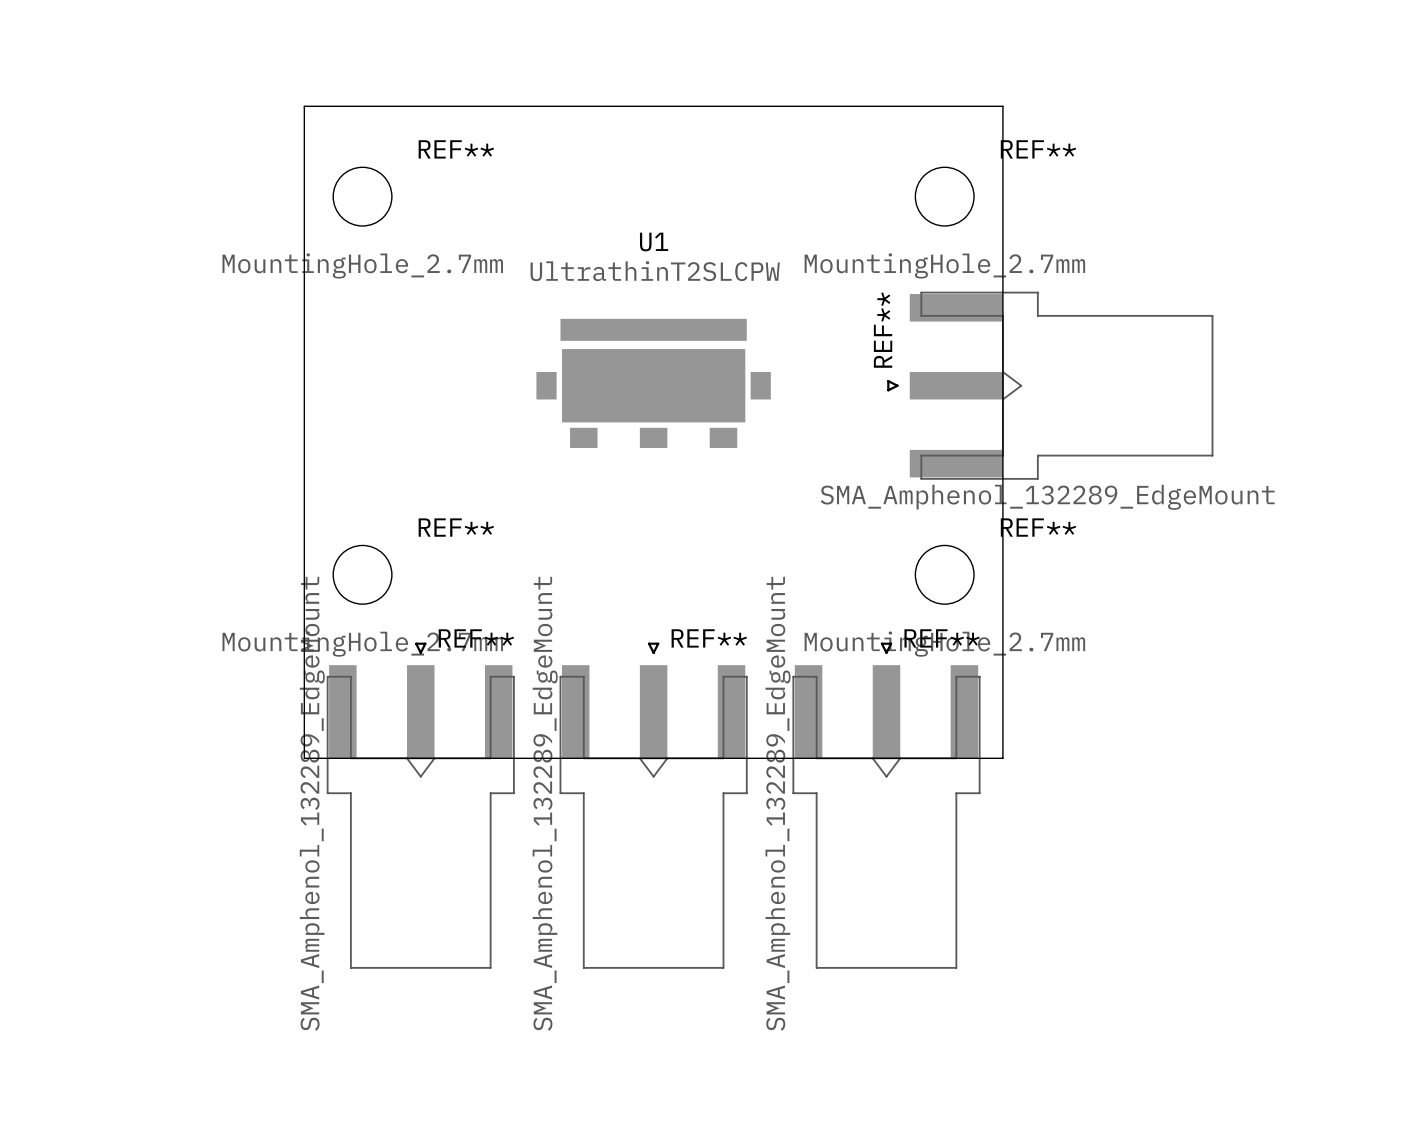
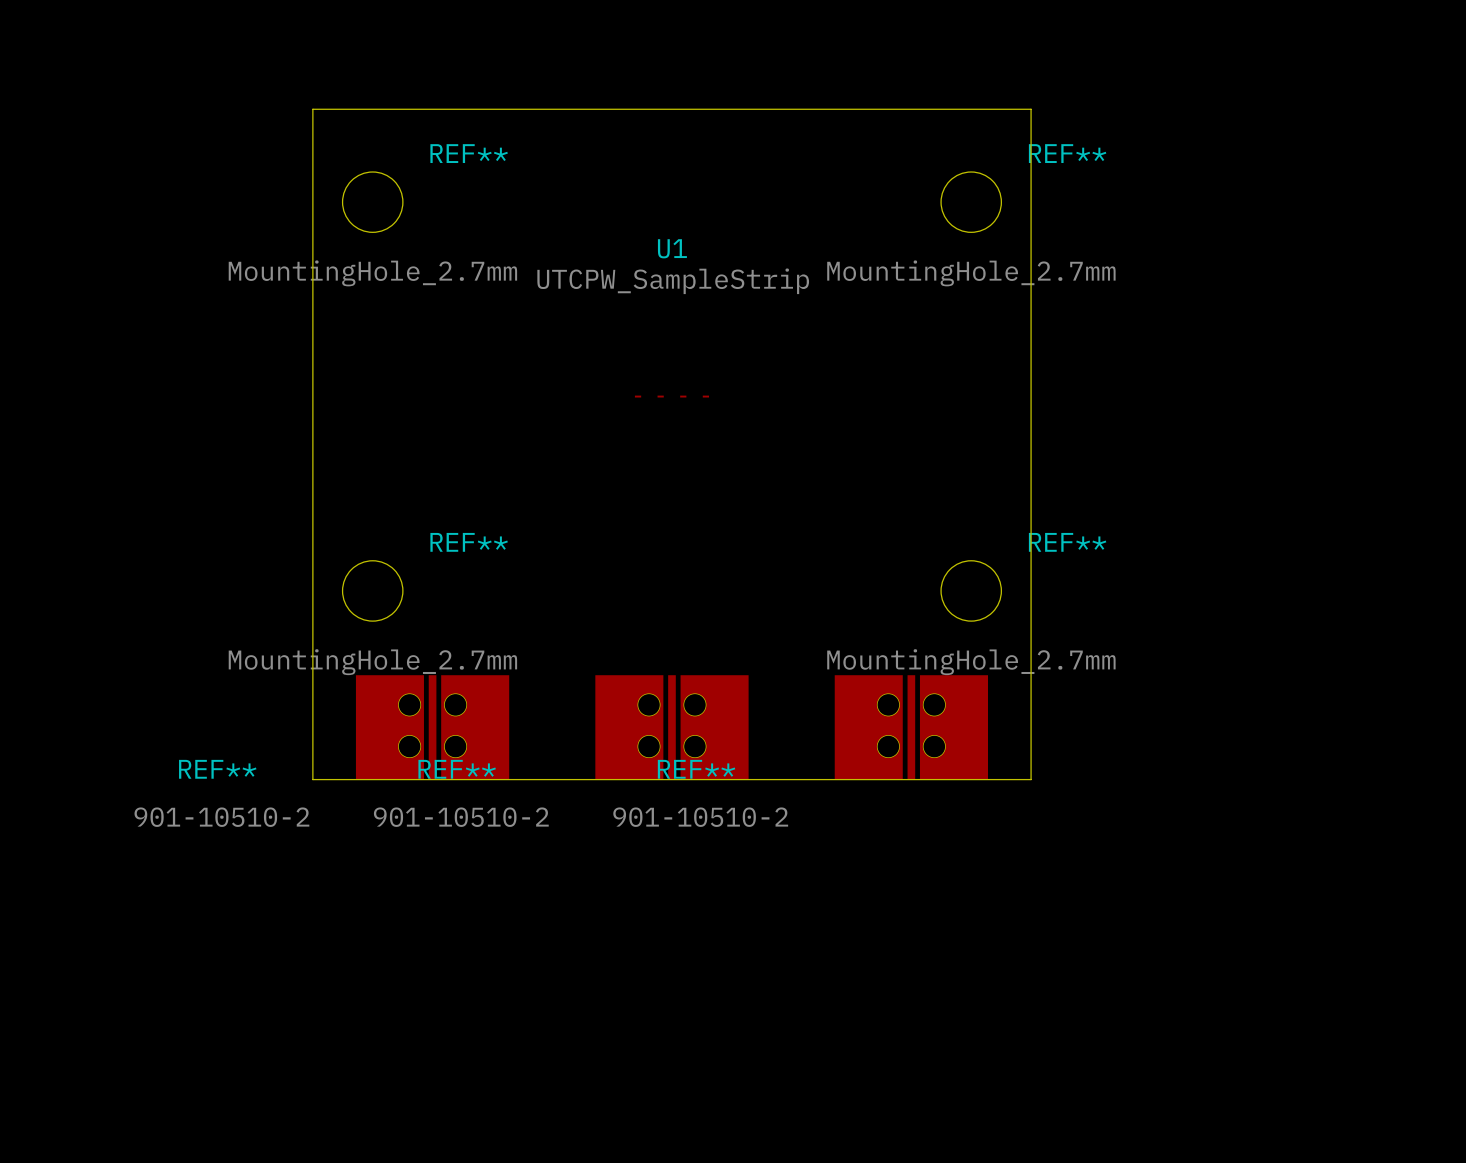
U1 value: UltrathinT2SLCPW (655, 271) -> UTCPW_SampleStrip (673, 281)
U1 footprint: [536, 318, 771, 448] -> [634, 395, 710, 398]
REF**: SMA_Amphenol_132289_EdgeMount (1050, 385) -> none
REF**: none -> 901-10510-2 (432, 727)
REF**: none -> 901-10510-2 (671, 727)
REF**: none -> 901-10510-2 (911, 727)
REF**: SMA_Amphenol_132289_EdgeMount (420, 805) -> none
REF**: SMA_Amphenol_132289_EdgeMount (653, 805) -> none
REF**: SMA_Amphenol_132289_EdgeMount (886, 805) -> none

